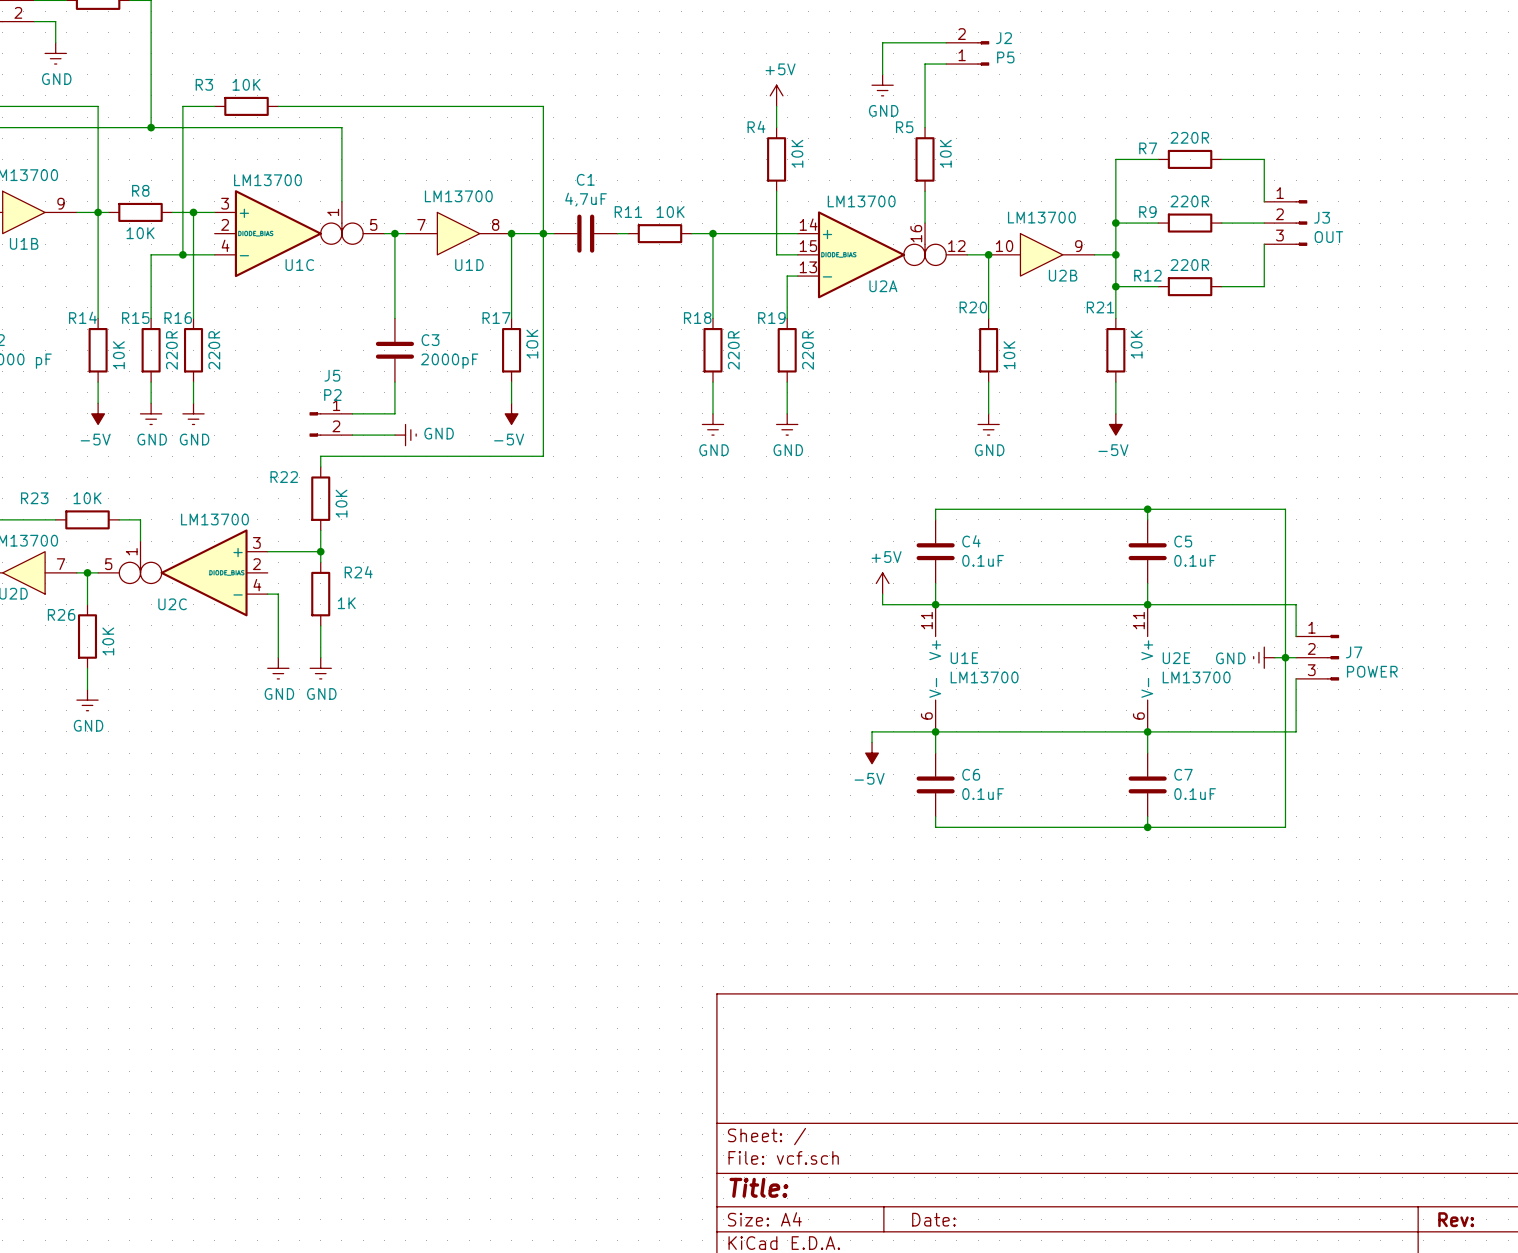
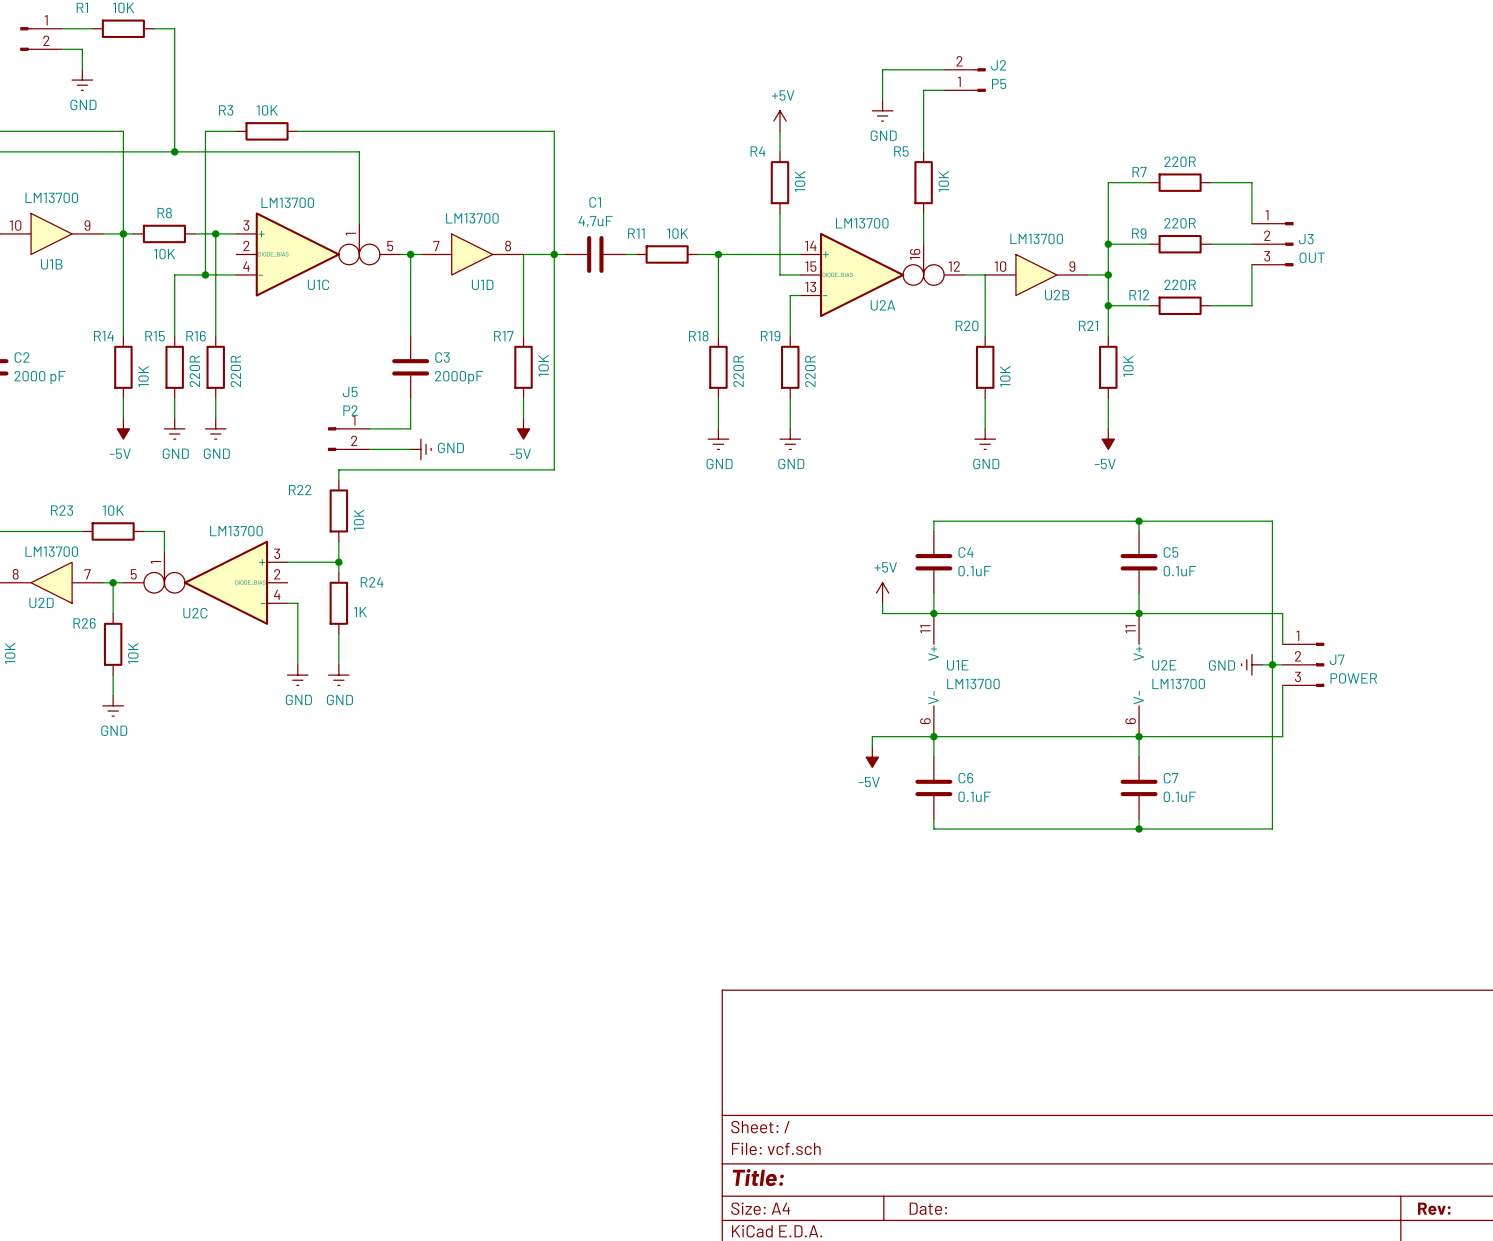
junction: (511, 233) -> none
junction: (988, 254) -> none

